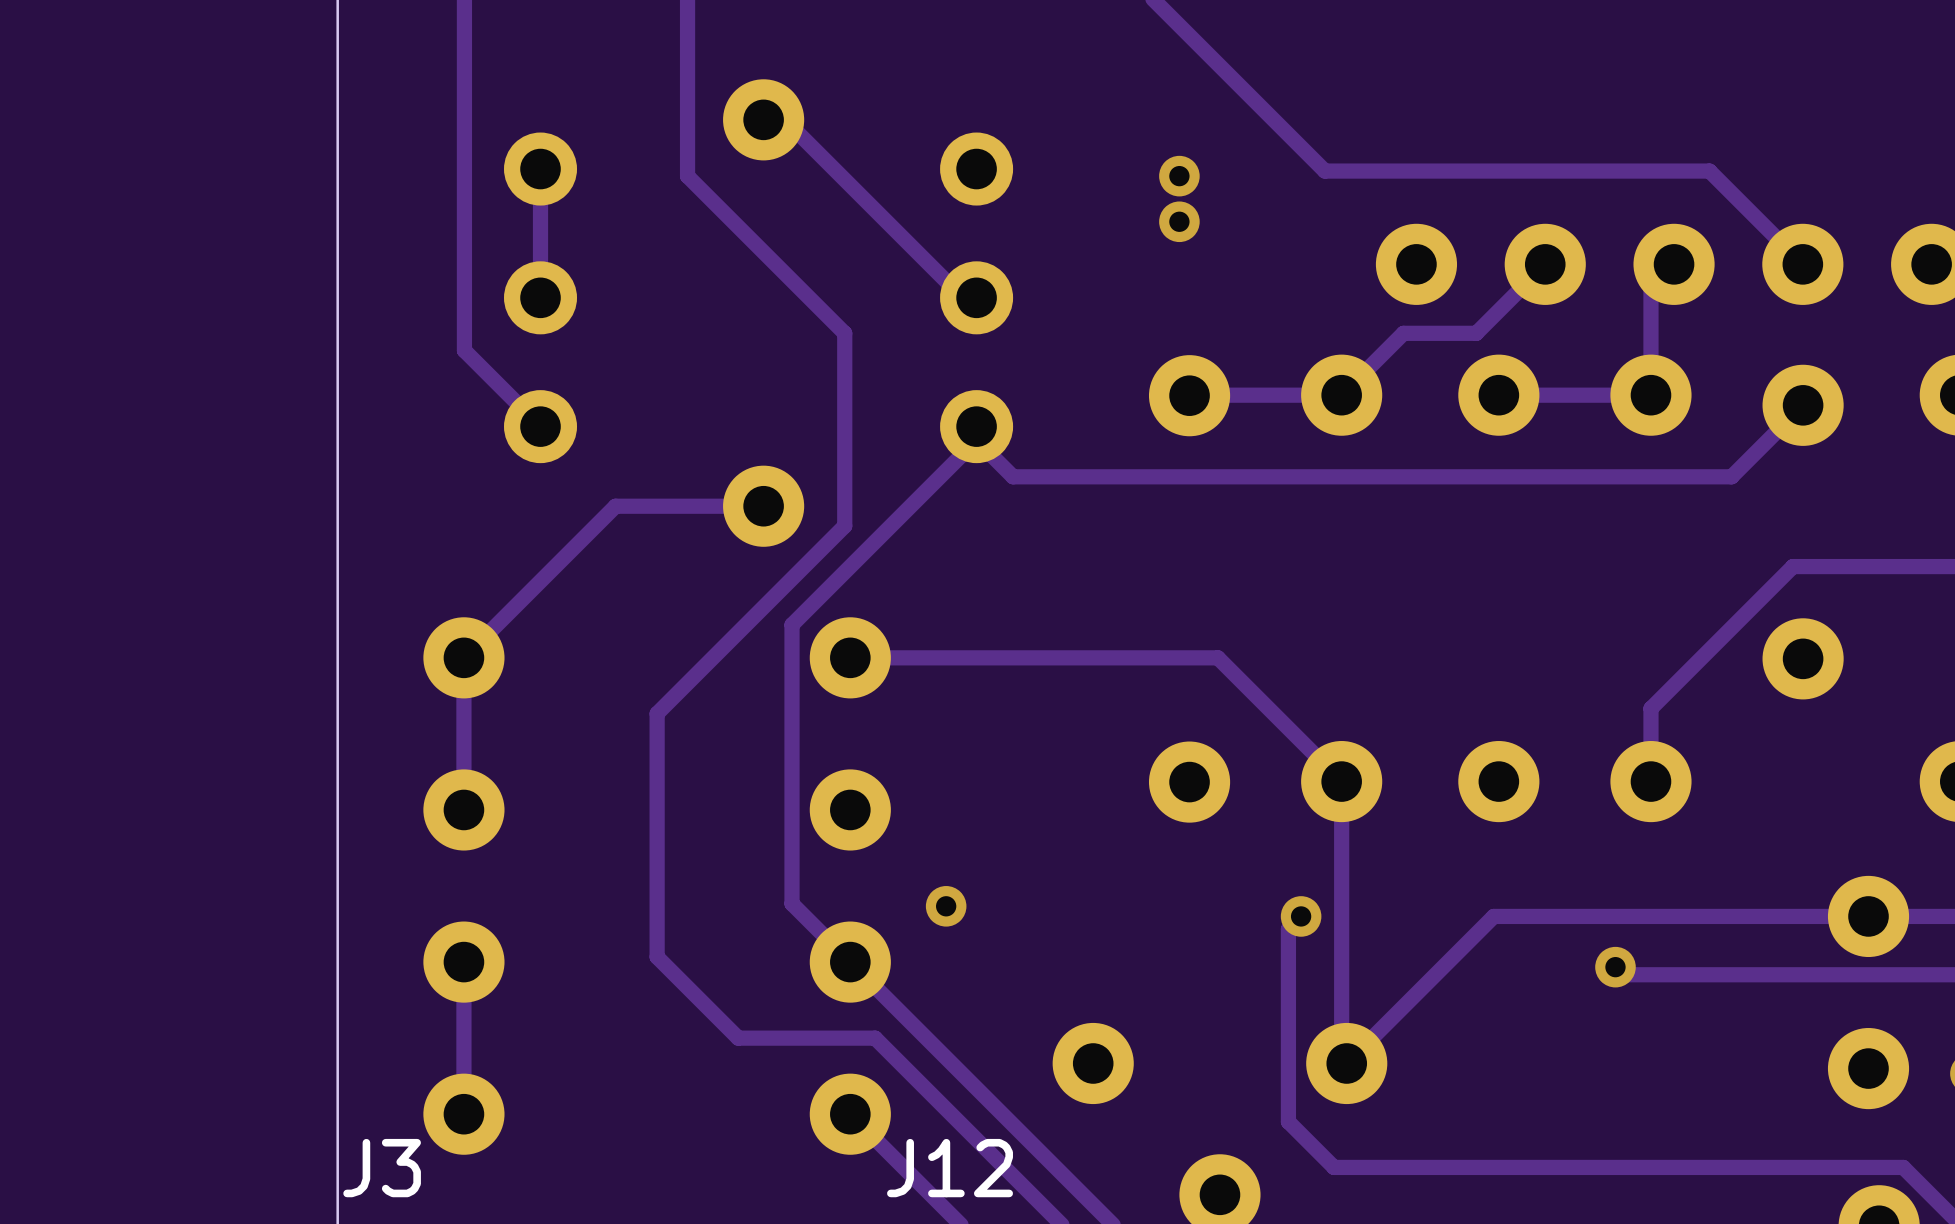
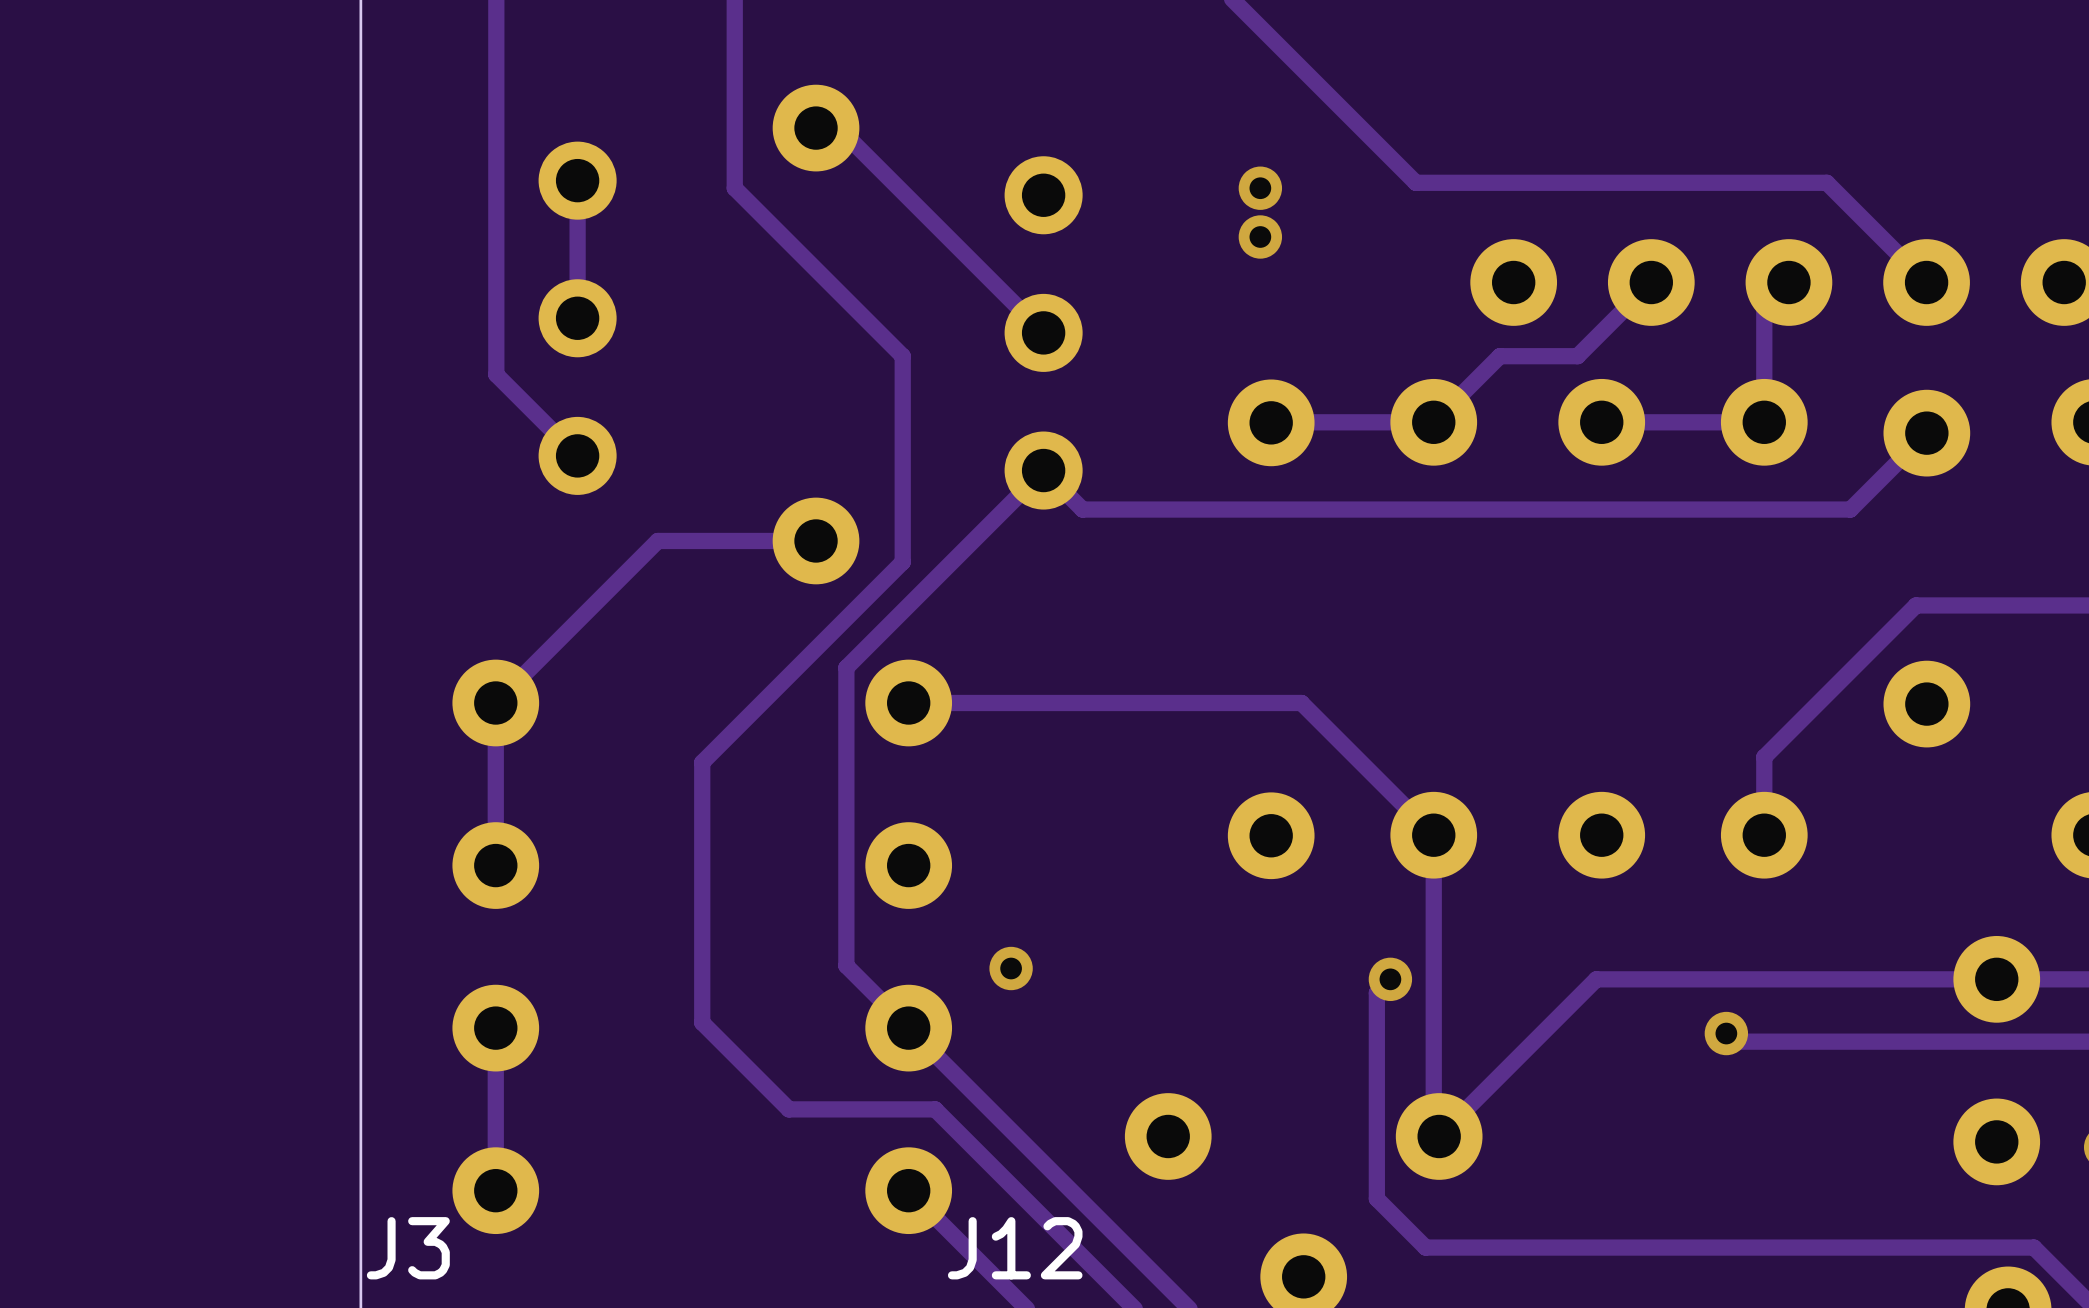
part position: (976, 297) -> (1043, 332)

